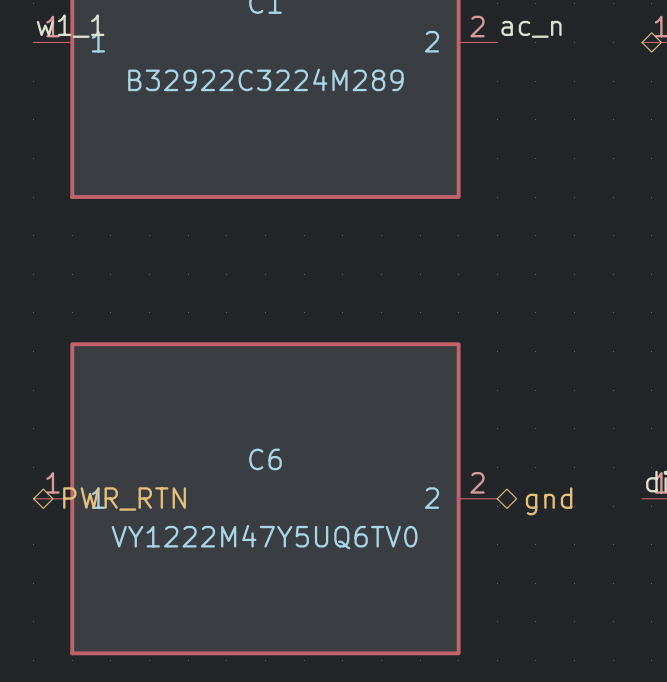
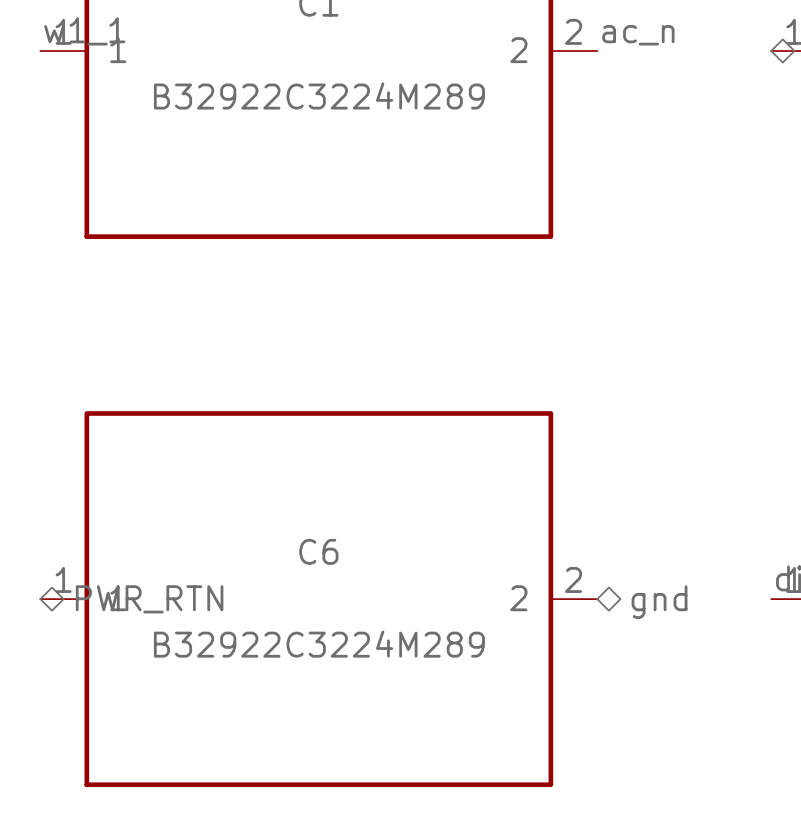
C6 value: VY1222M47Y5UQ6TV0 (264, 537) -> B32922C3224M289 (319, 644)

